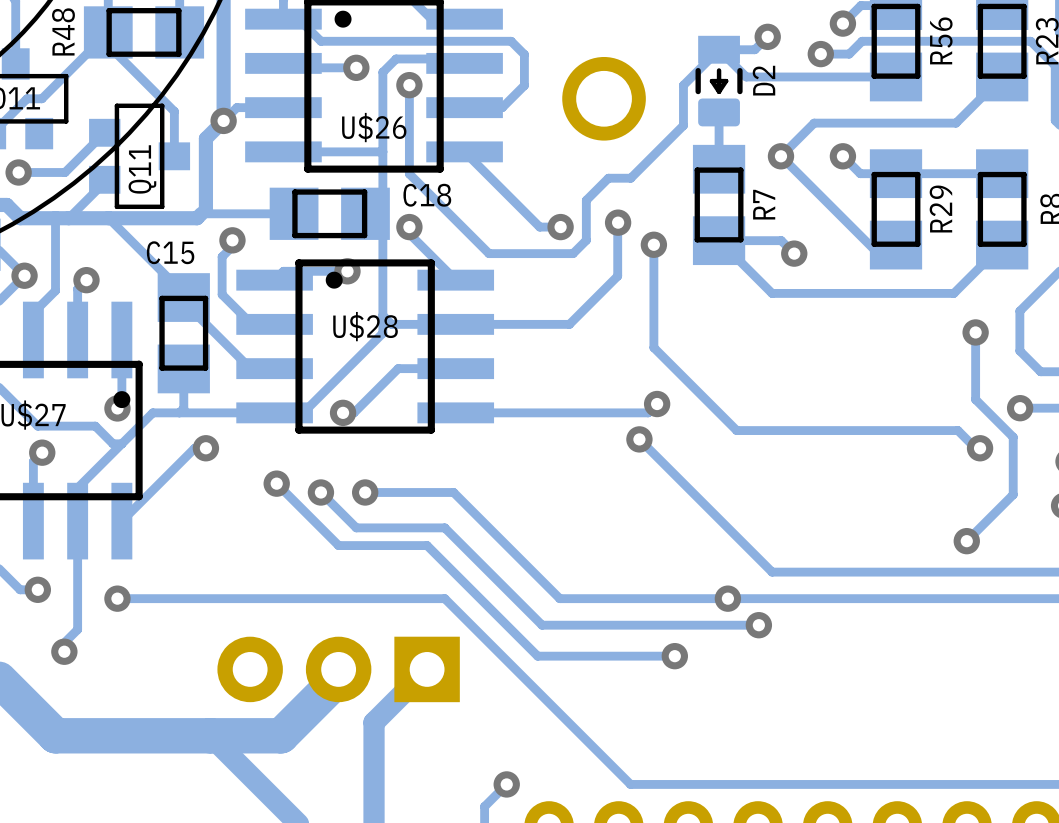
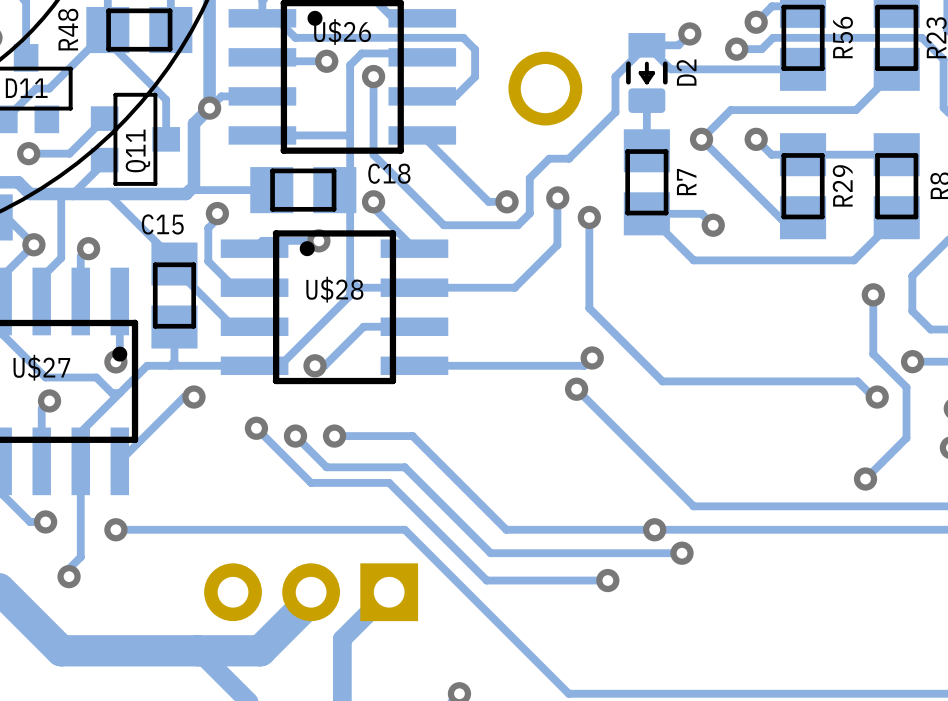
U$26 name position: U$26 (374, 127) -> U$26 (342, 31)

